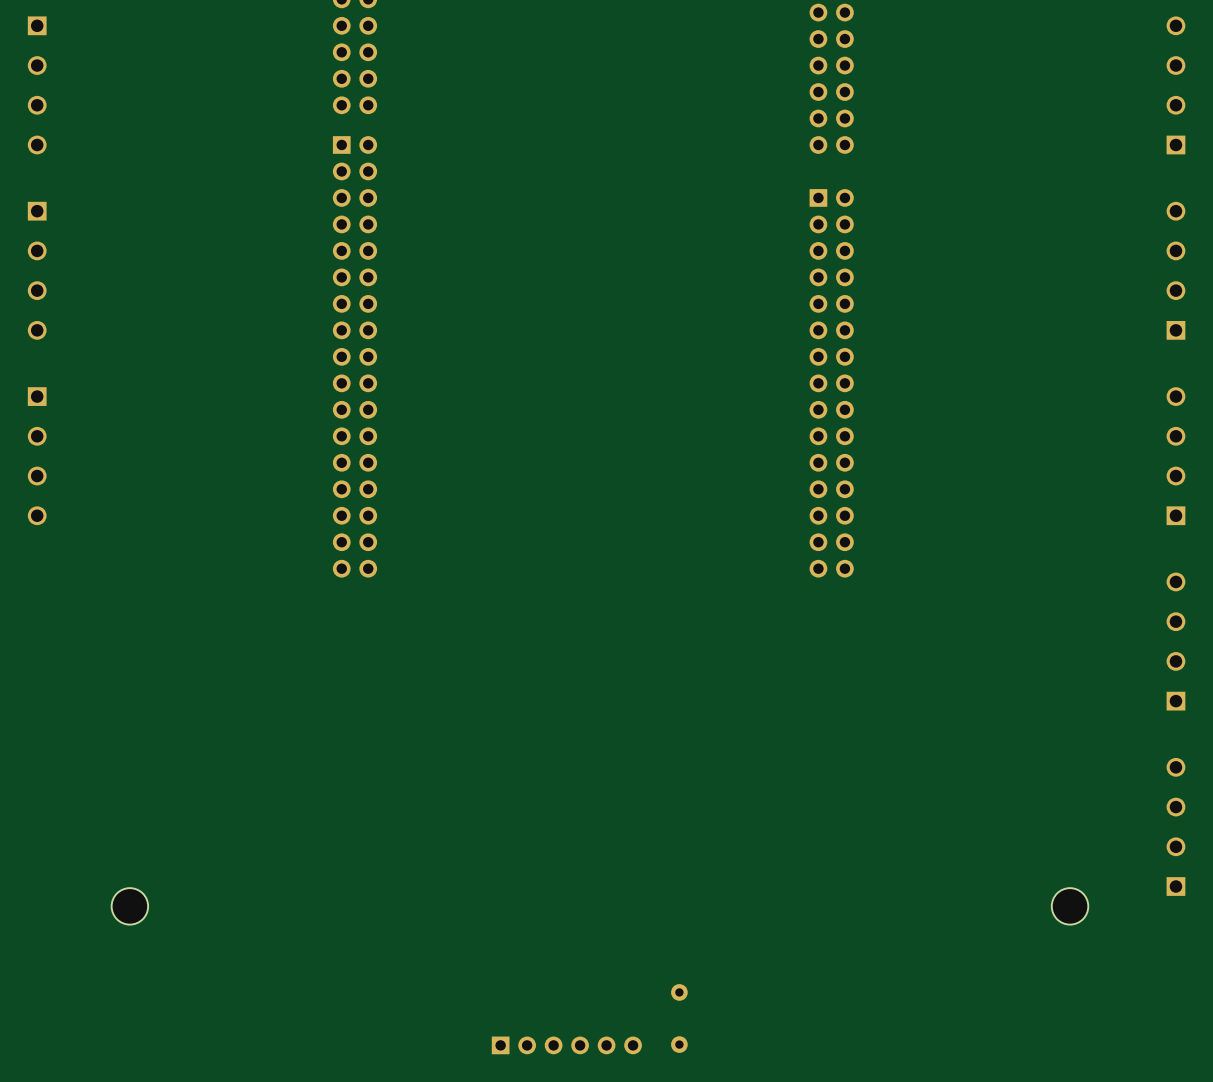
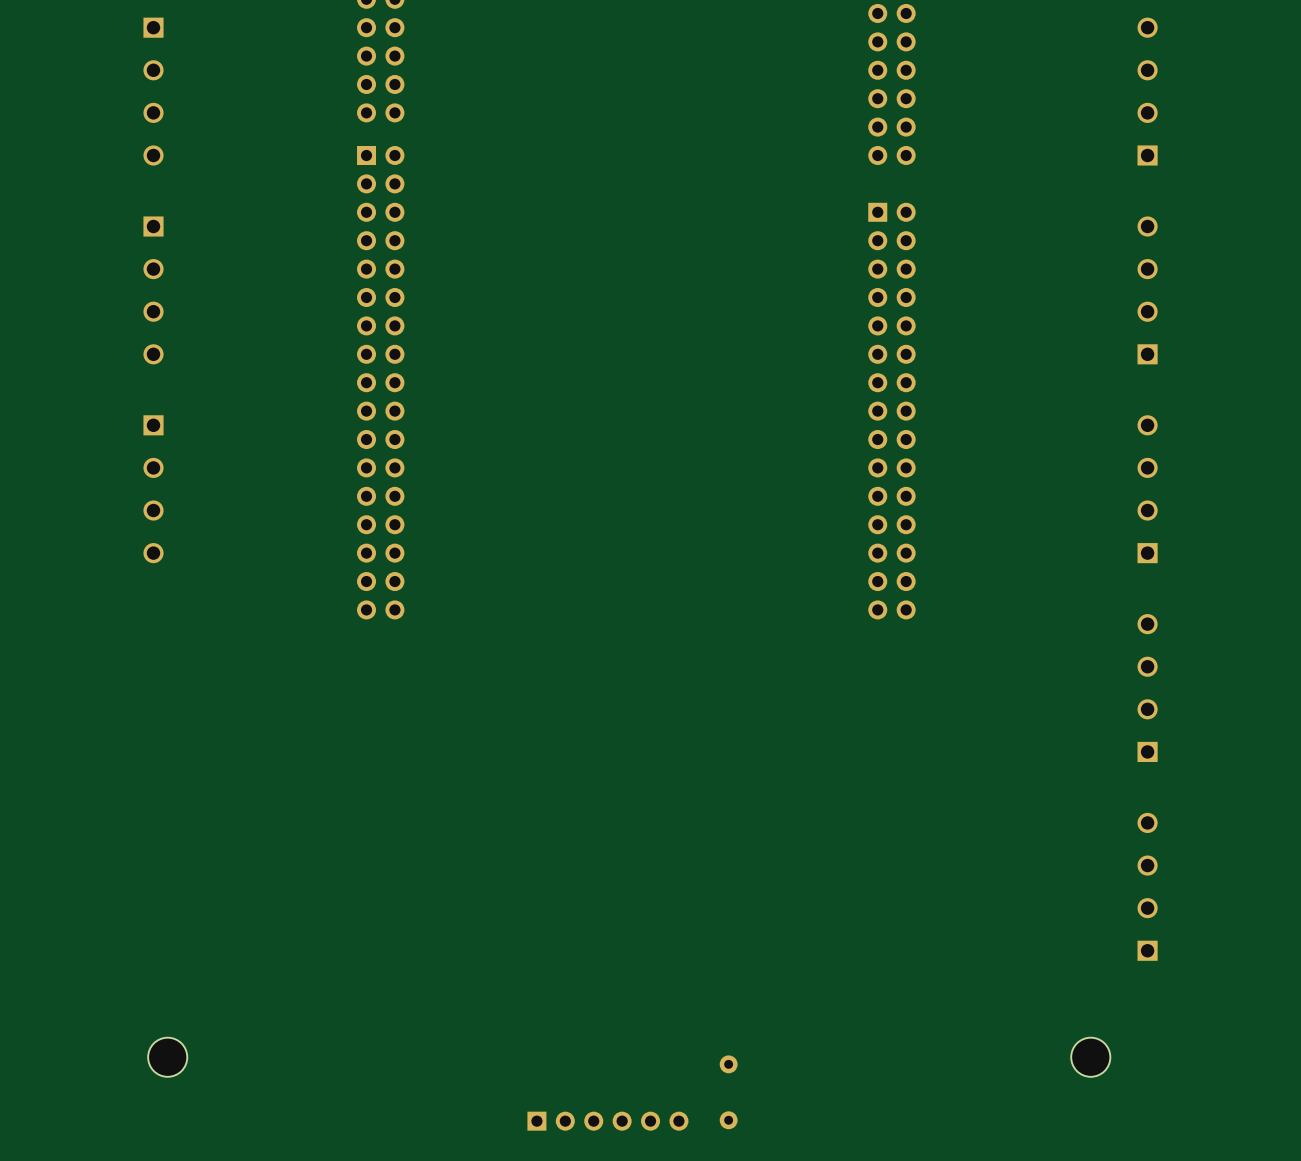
part position: (37, 85) -> (153, 91)
part position: (1175, 85) -> (1147, 91)
part position: (37, 270) -> (153, 290)
part position: (1175, 270) -> (1147, 290)
part position: (37, 456) -> (153, 489)
part position: (1175, 456) -> (1147, 489)
part position: (1175, 641) -> (1147, 688)
part position: (1175, 826) -> (1147, 886)
part position: (129, 906) -> (167, 1057)
part position: (1070, 906) -> (1090, 1057)

